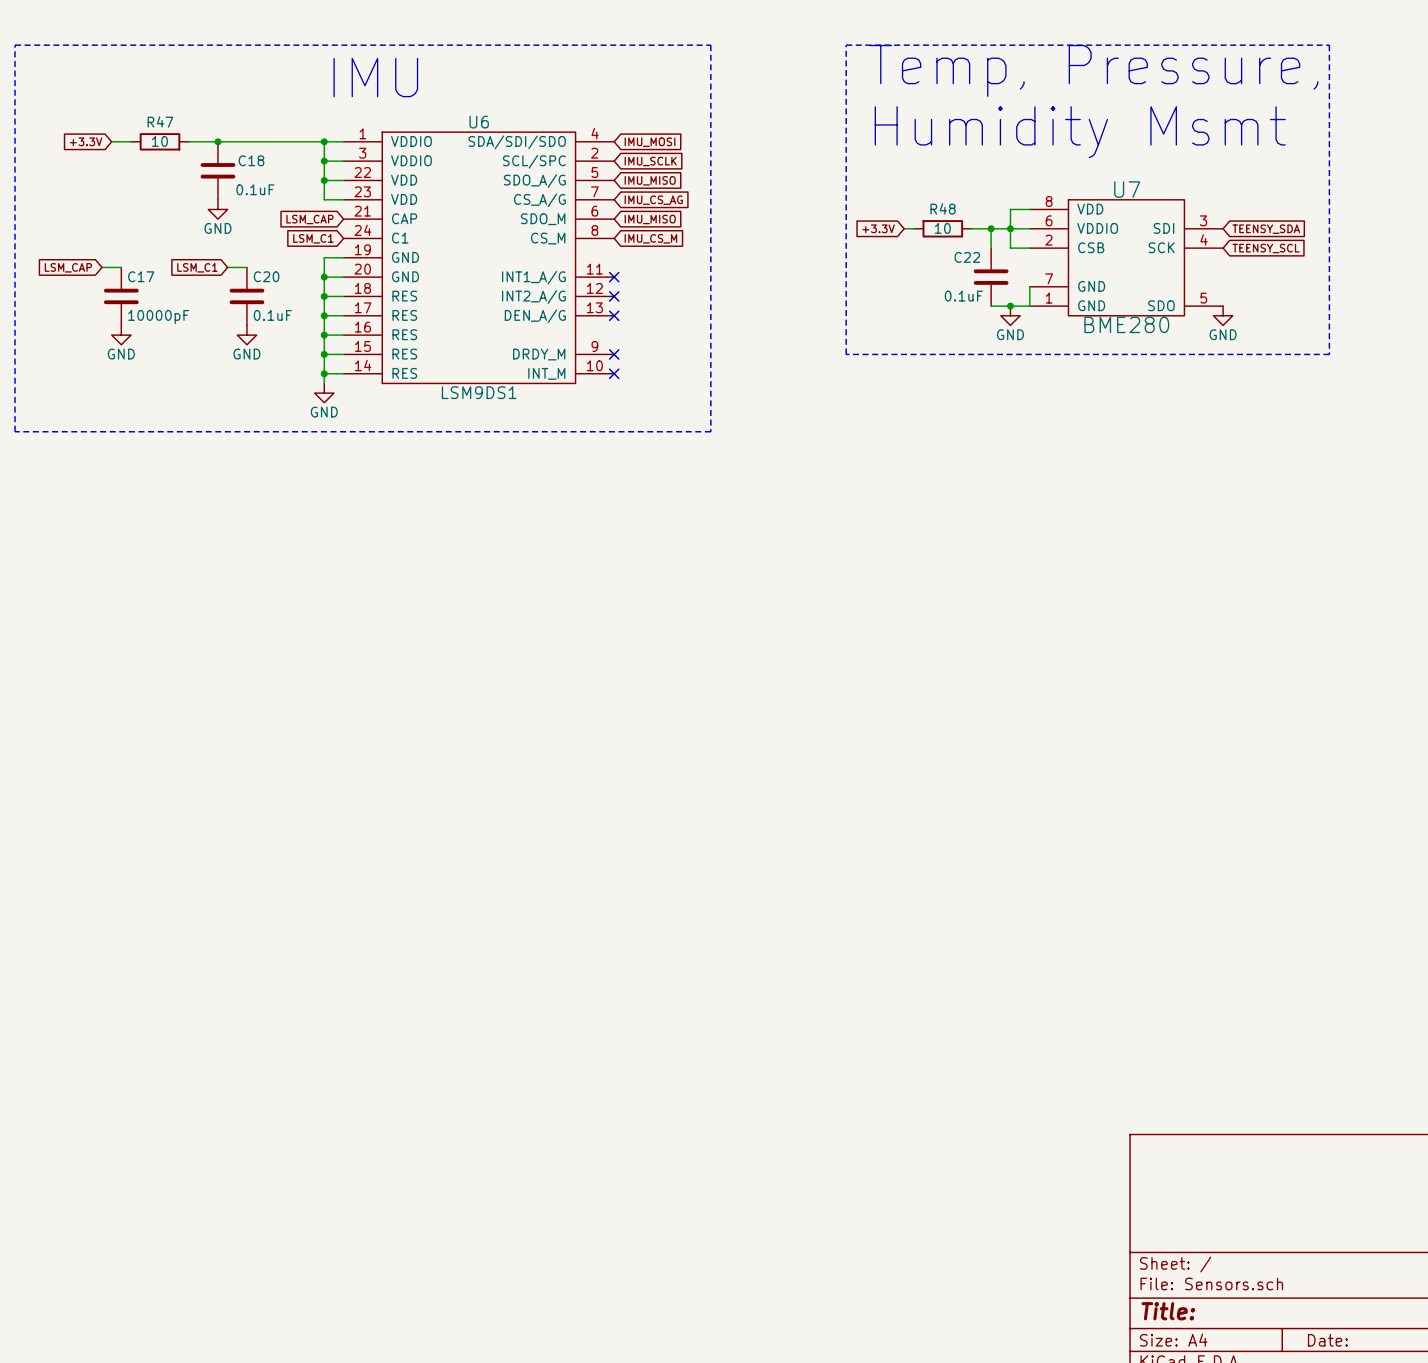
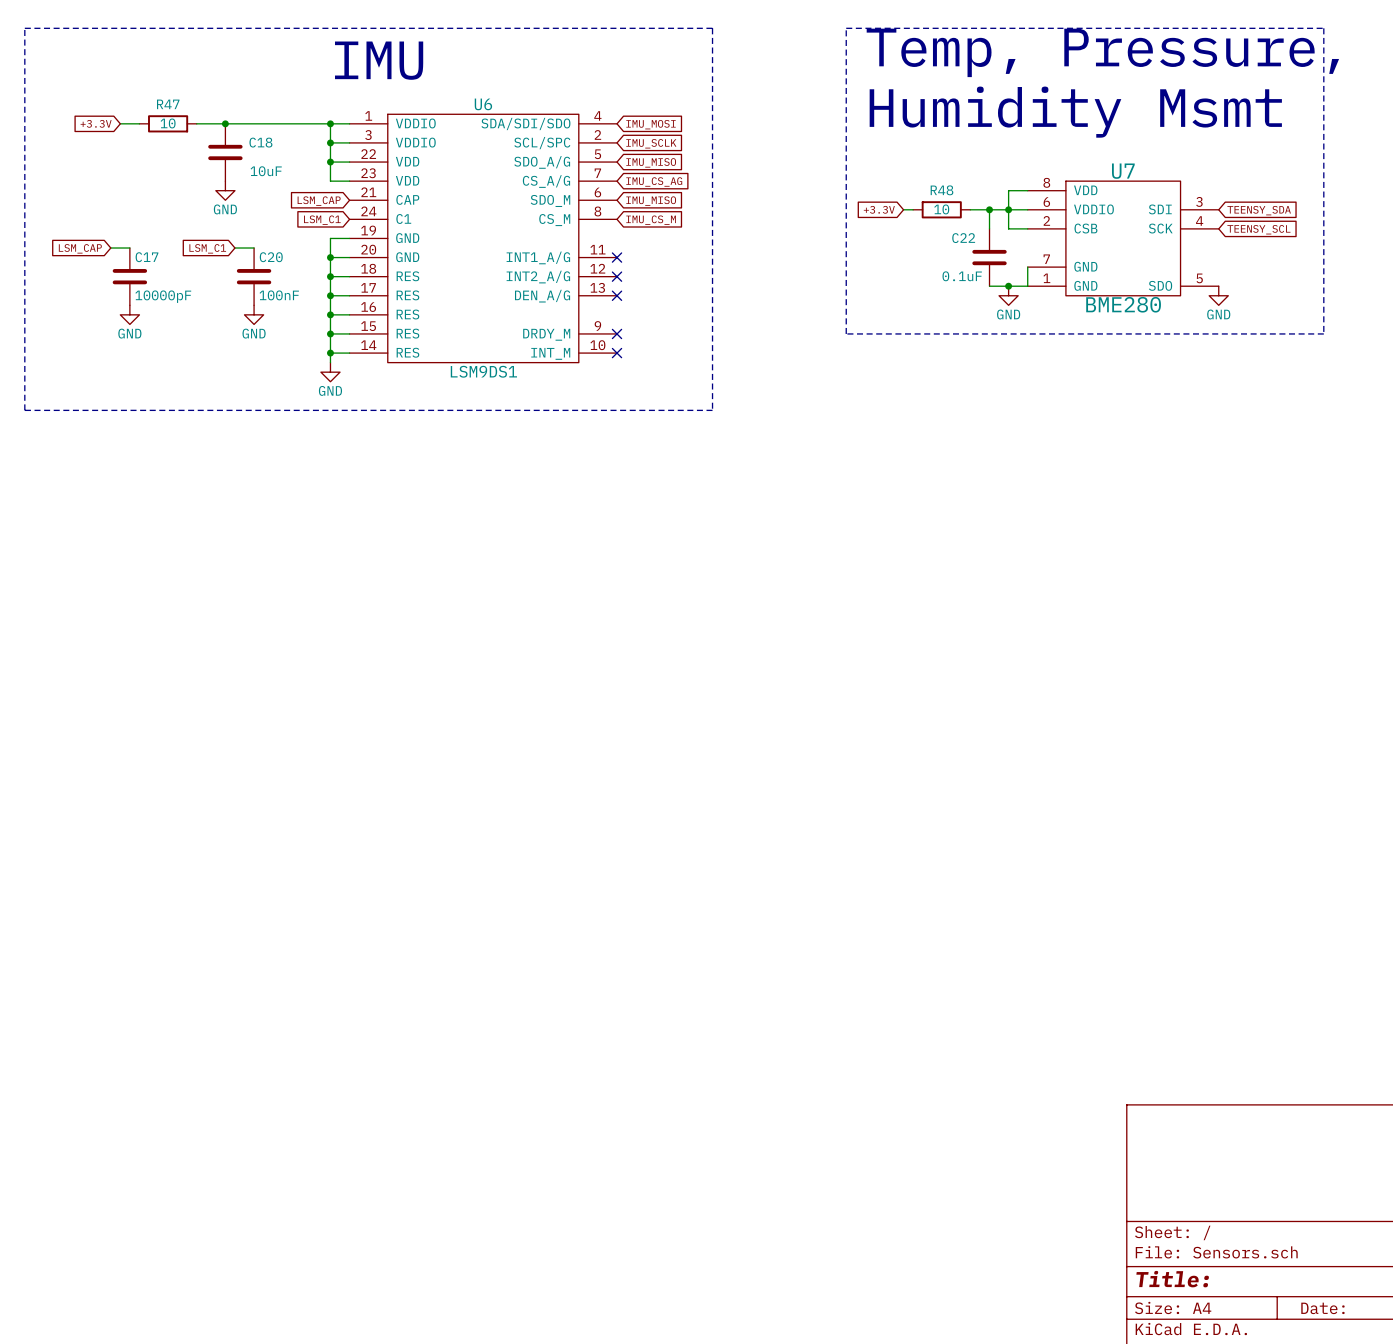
C18 value: 0.1uF (255, 189) -> 10uF (266, 171)
C20 value: 0.1uF (272, 315) -> 100nF (279, 295)

